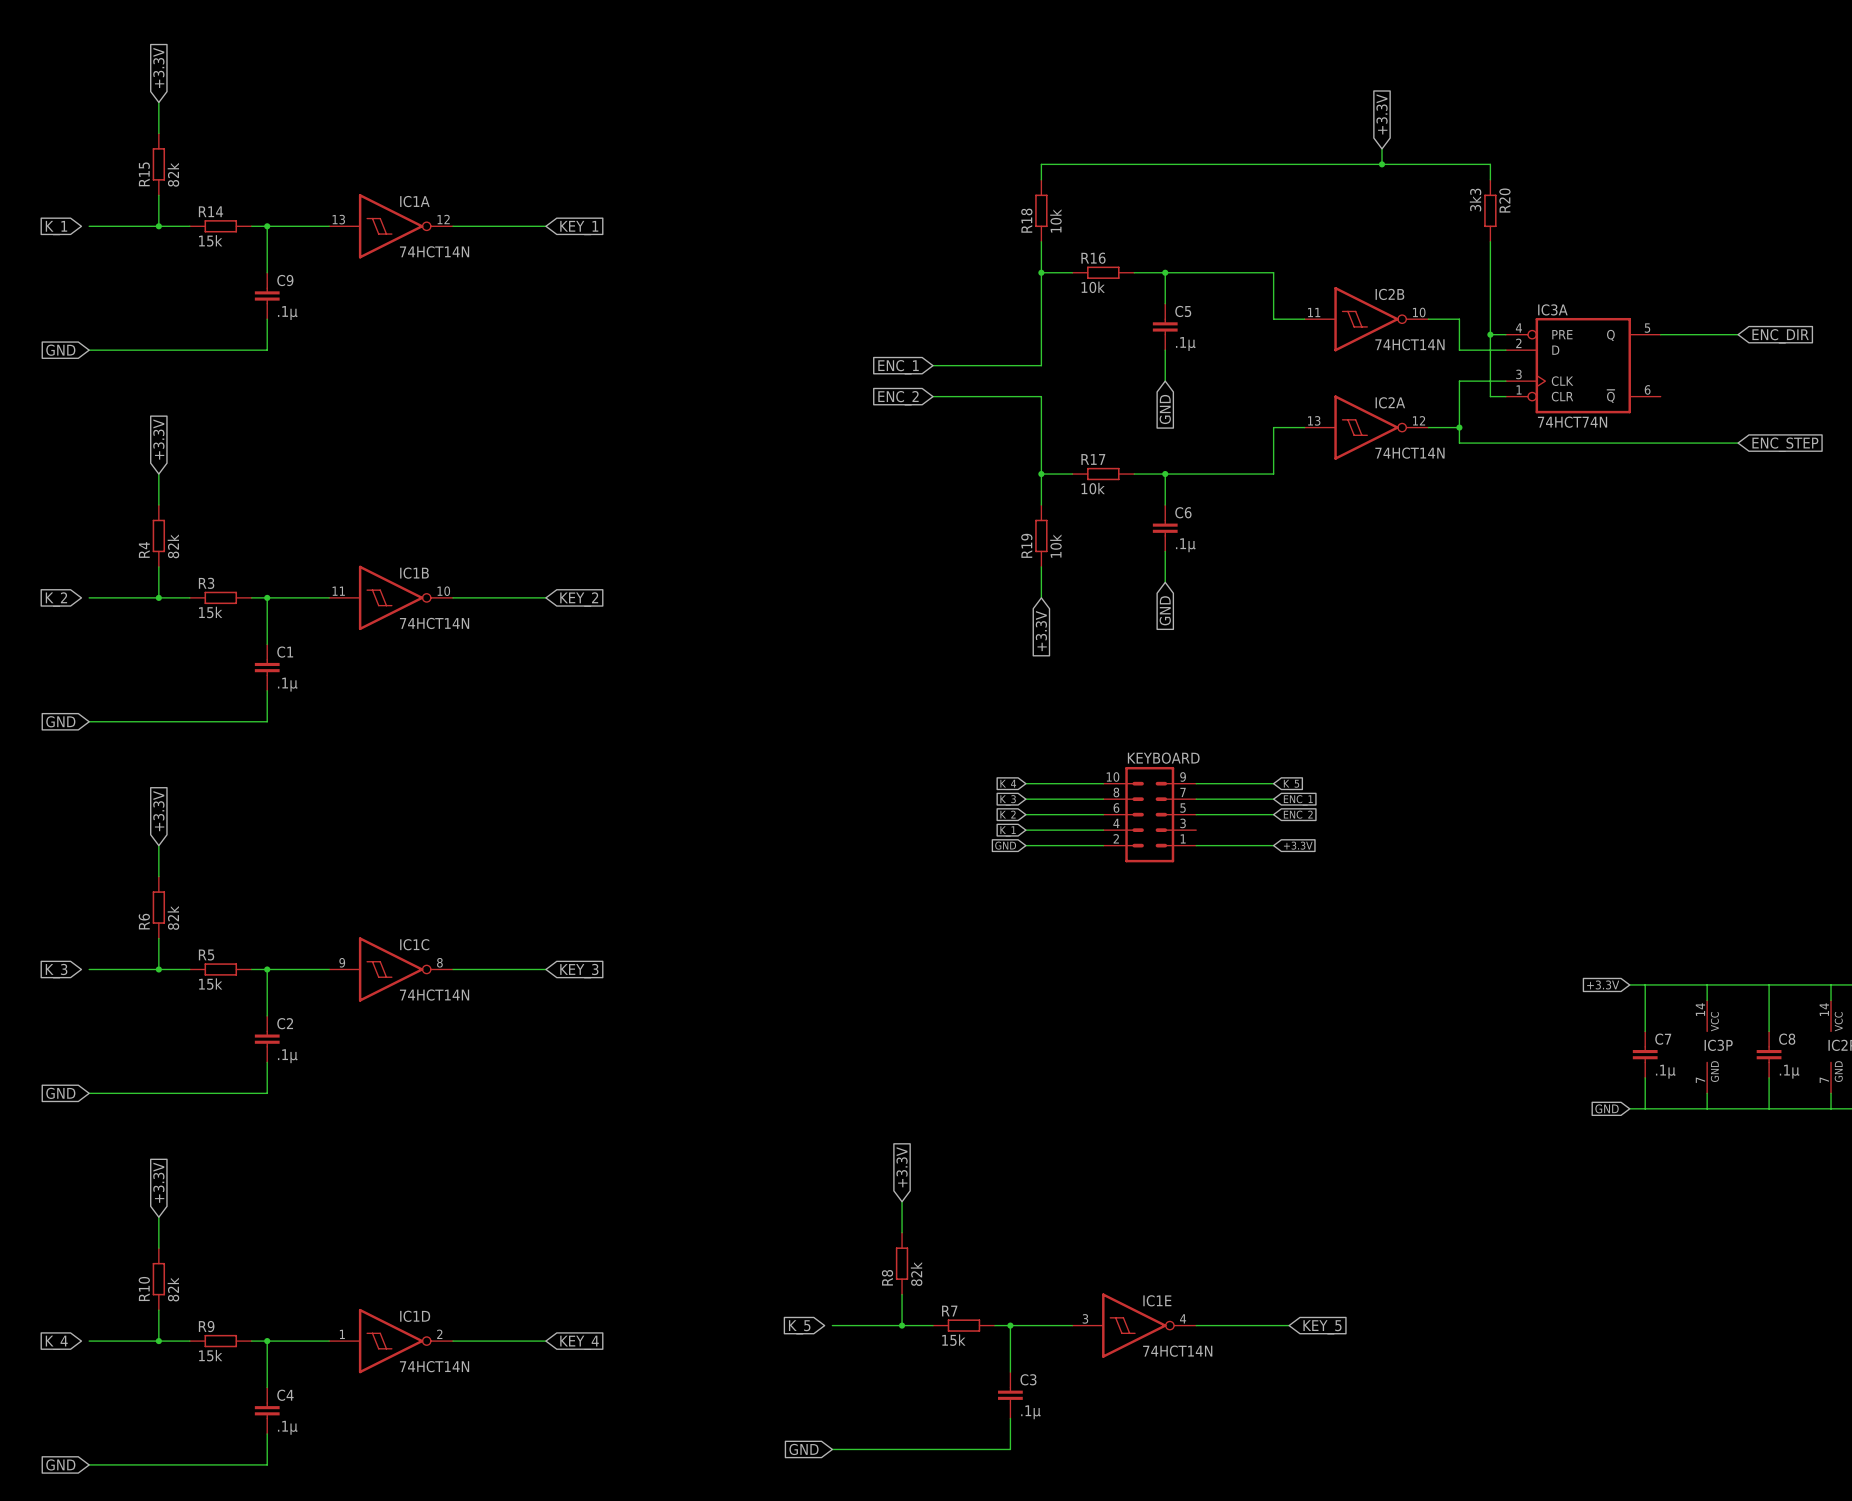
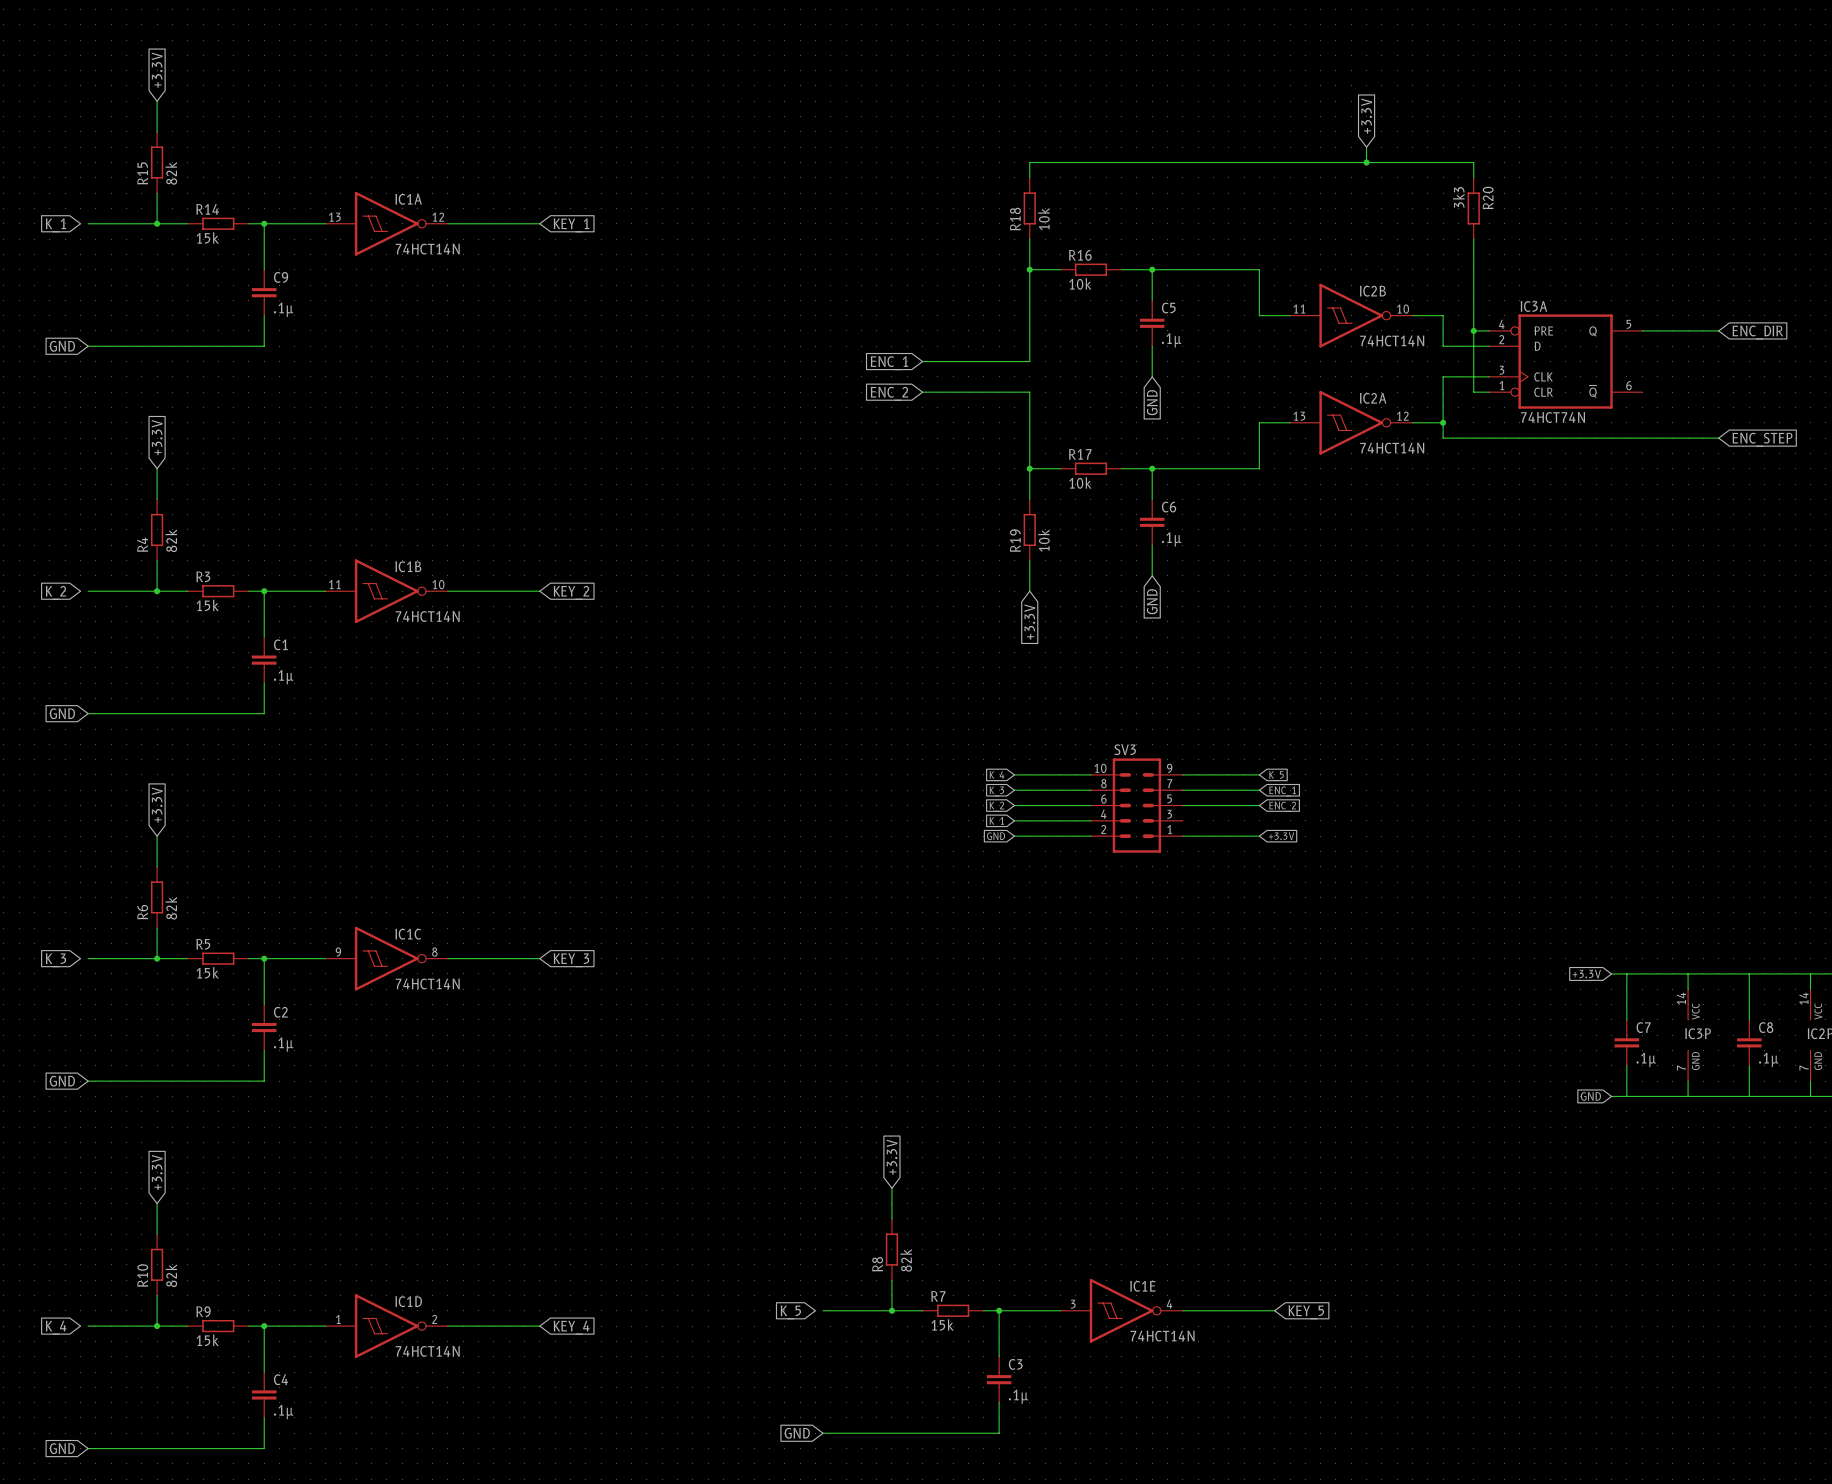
KEYBOARD name: KEYBOARD (1163, 758) -> SV3 (1125, 749)

